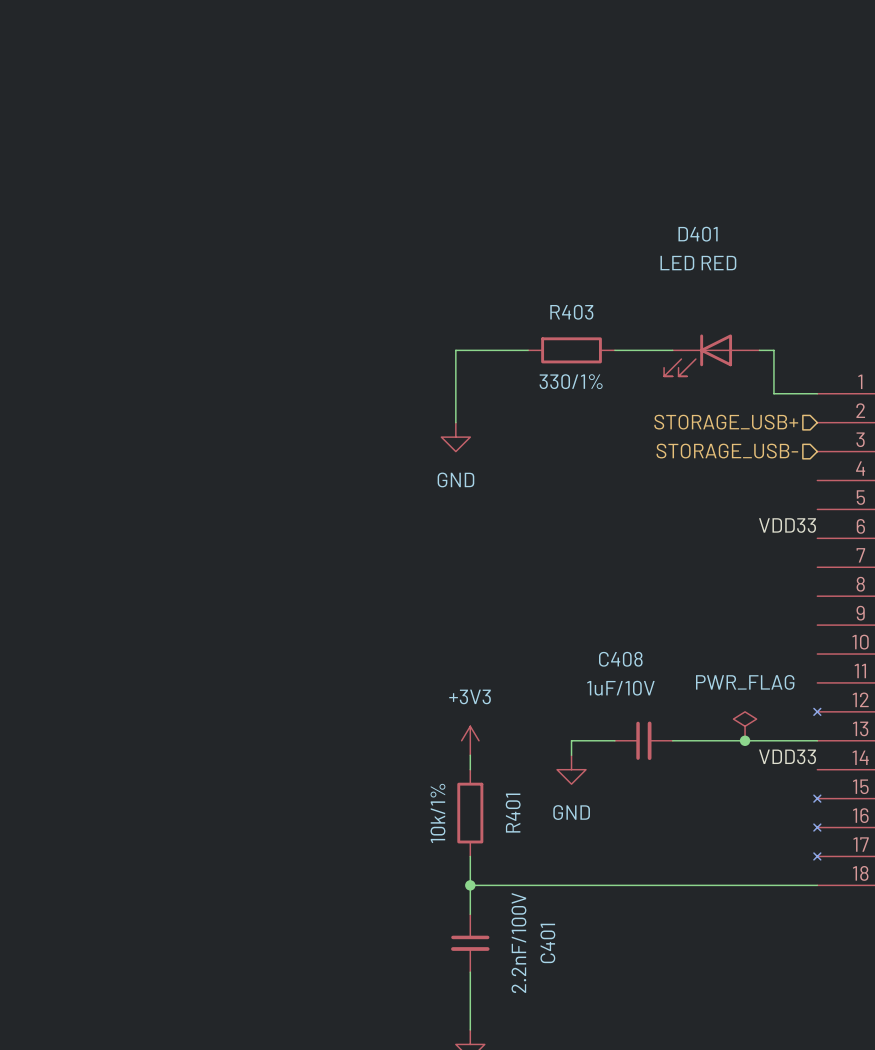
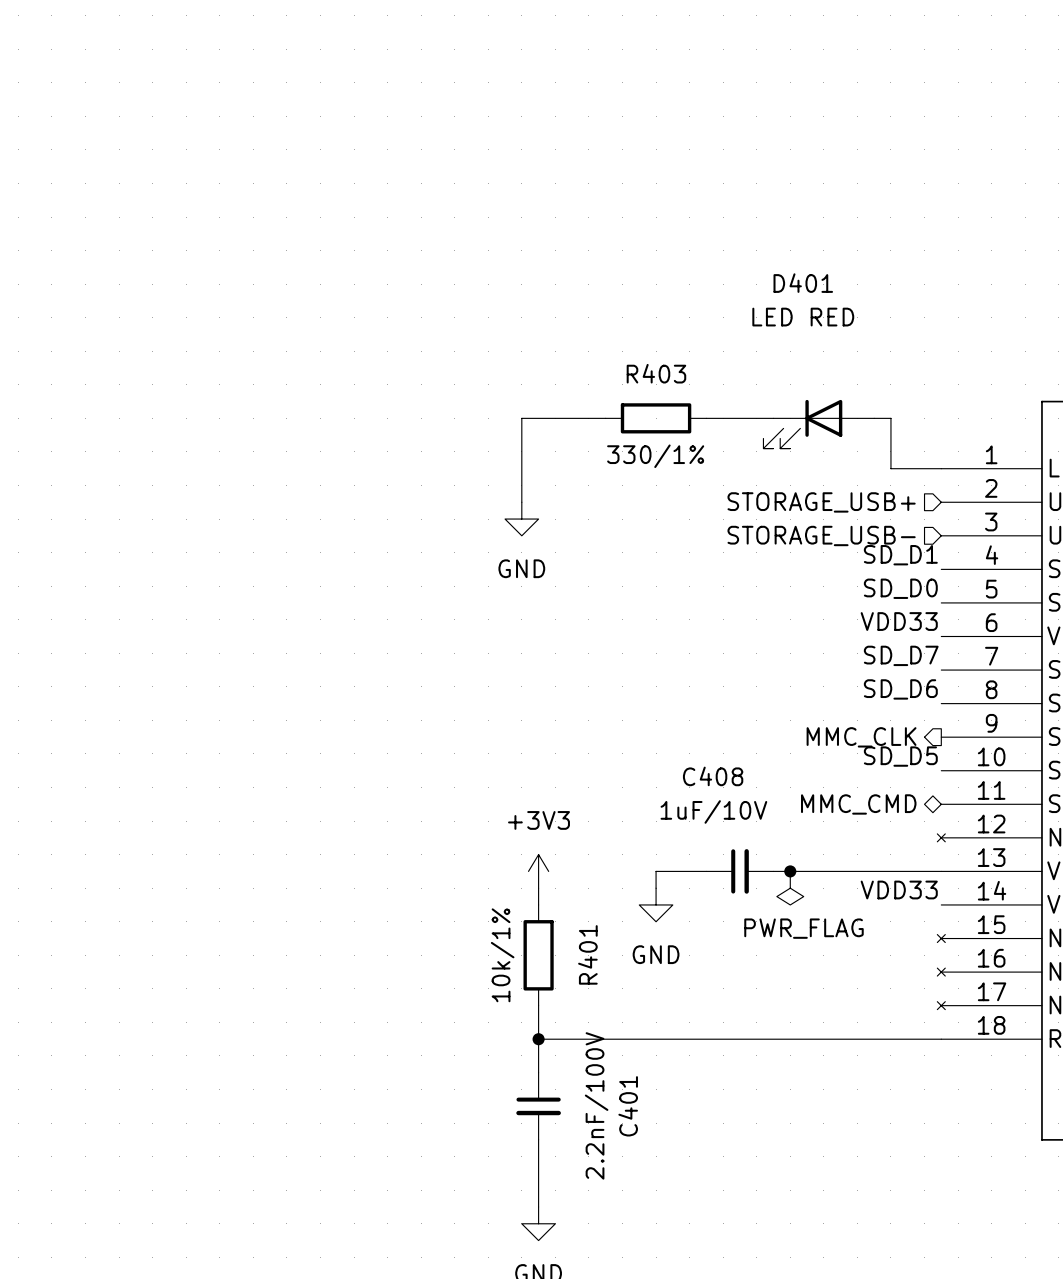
label: none -> SD_D1 (900, 555)
label: none -> SD_D0 (900, 588)
label: none -> SD_D7 (901, 655)
label: none -> SD_D6 (900, 689)
hierarchical label: none -> MMC_CLK (861, 737)
label: none -> SD_D5 (900, 756)
hierarchical label: none -> MMC_CMD (858, 804)
power symbol rotation: 0° (745, 726) -> 180° (790, 888)
power symbol position: PWR_FLAG (745, 726) -> PWR_FLAG (790, 888)
junction position: (745, 740) -> (790, 871)

